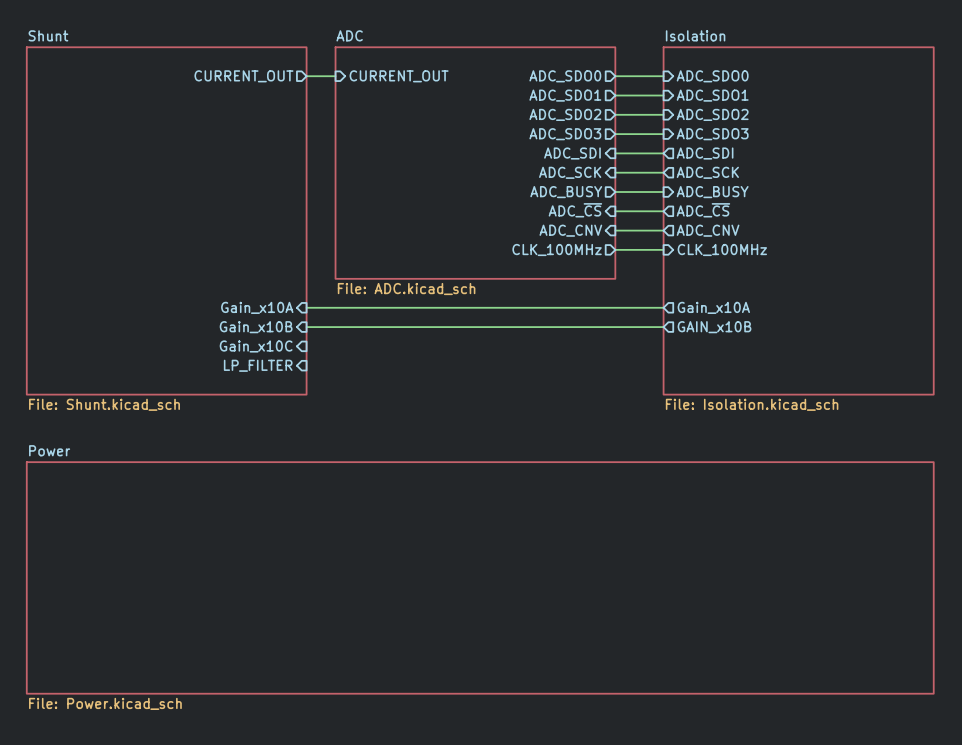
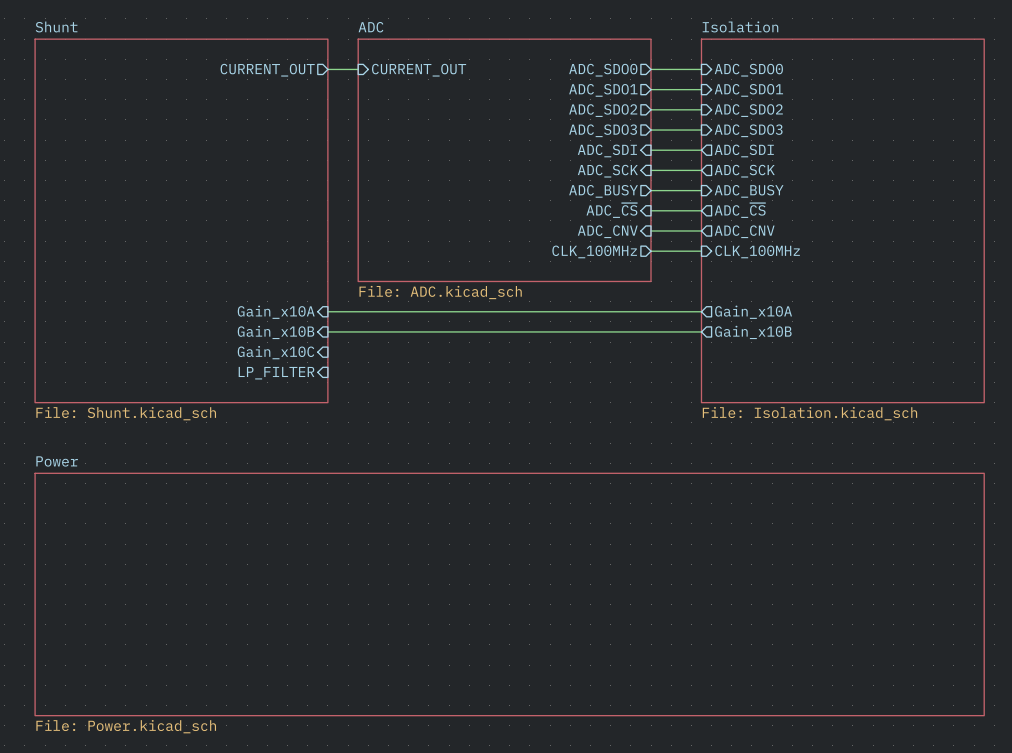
sheet pin: GAIN_x10B (714, 327) -> Gain_x10B (753, 332)

